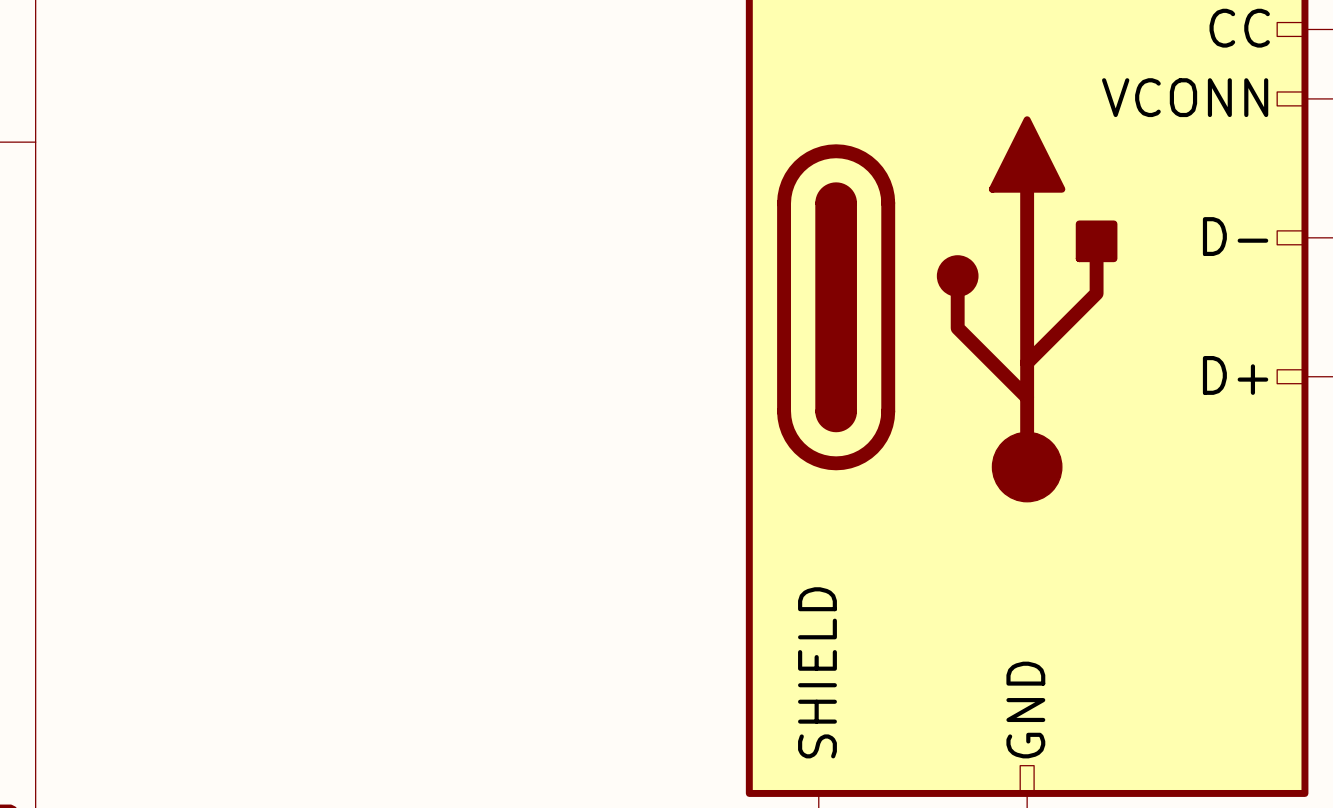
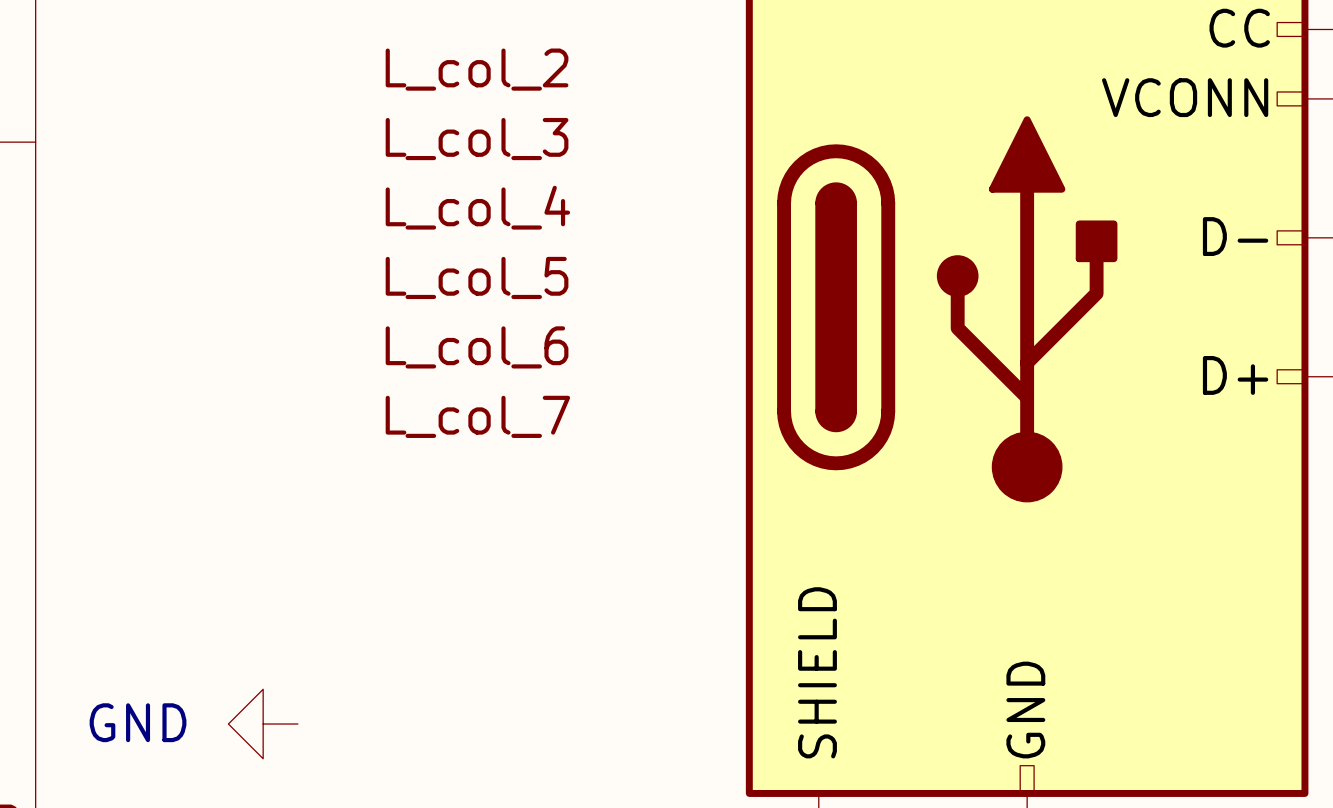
label: none -> L_col_2 (477, 69)
label: none -> L_col_3 (477, 139)
label: none -> L_col_4 (477, 207)
label: none -> L_col_5 (477, 277)
label: none -> L_col_6 (477, 347)
label: none -> L_col_7 (477, 416)
power symbol: none -> GND (263, 724)

